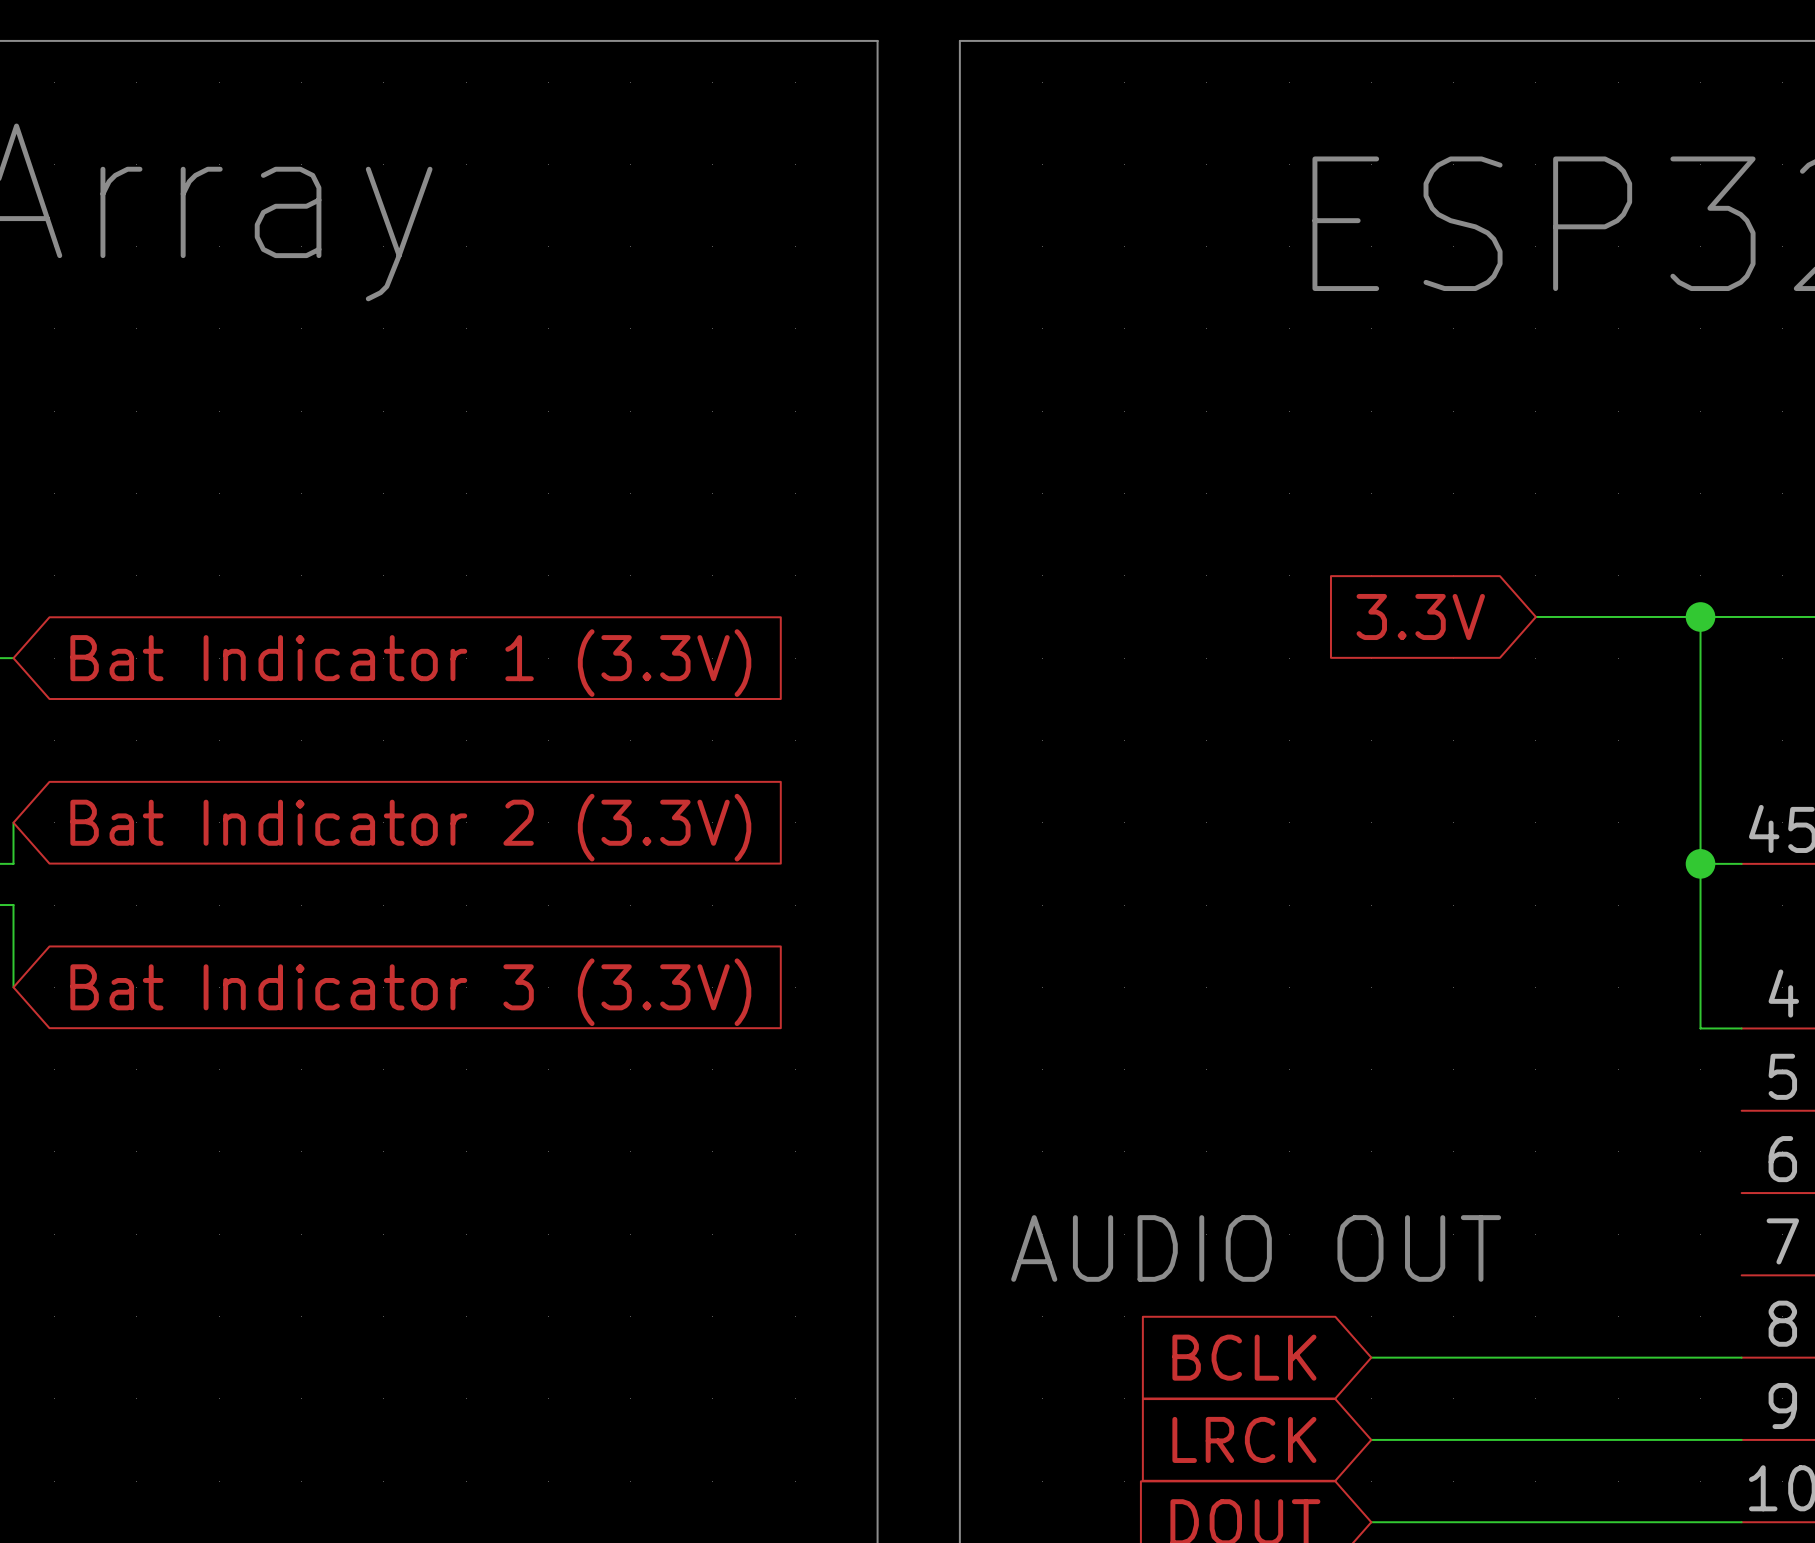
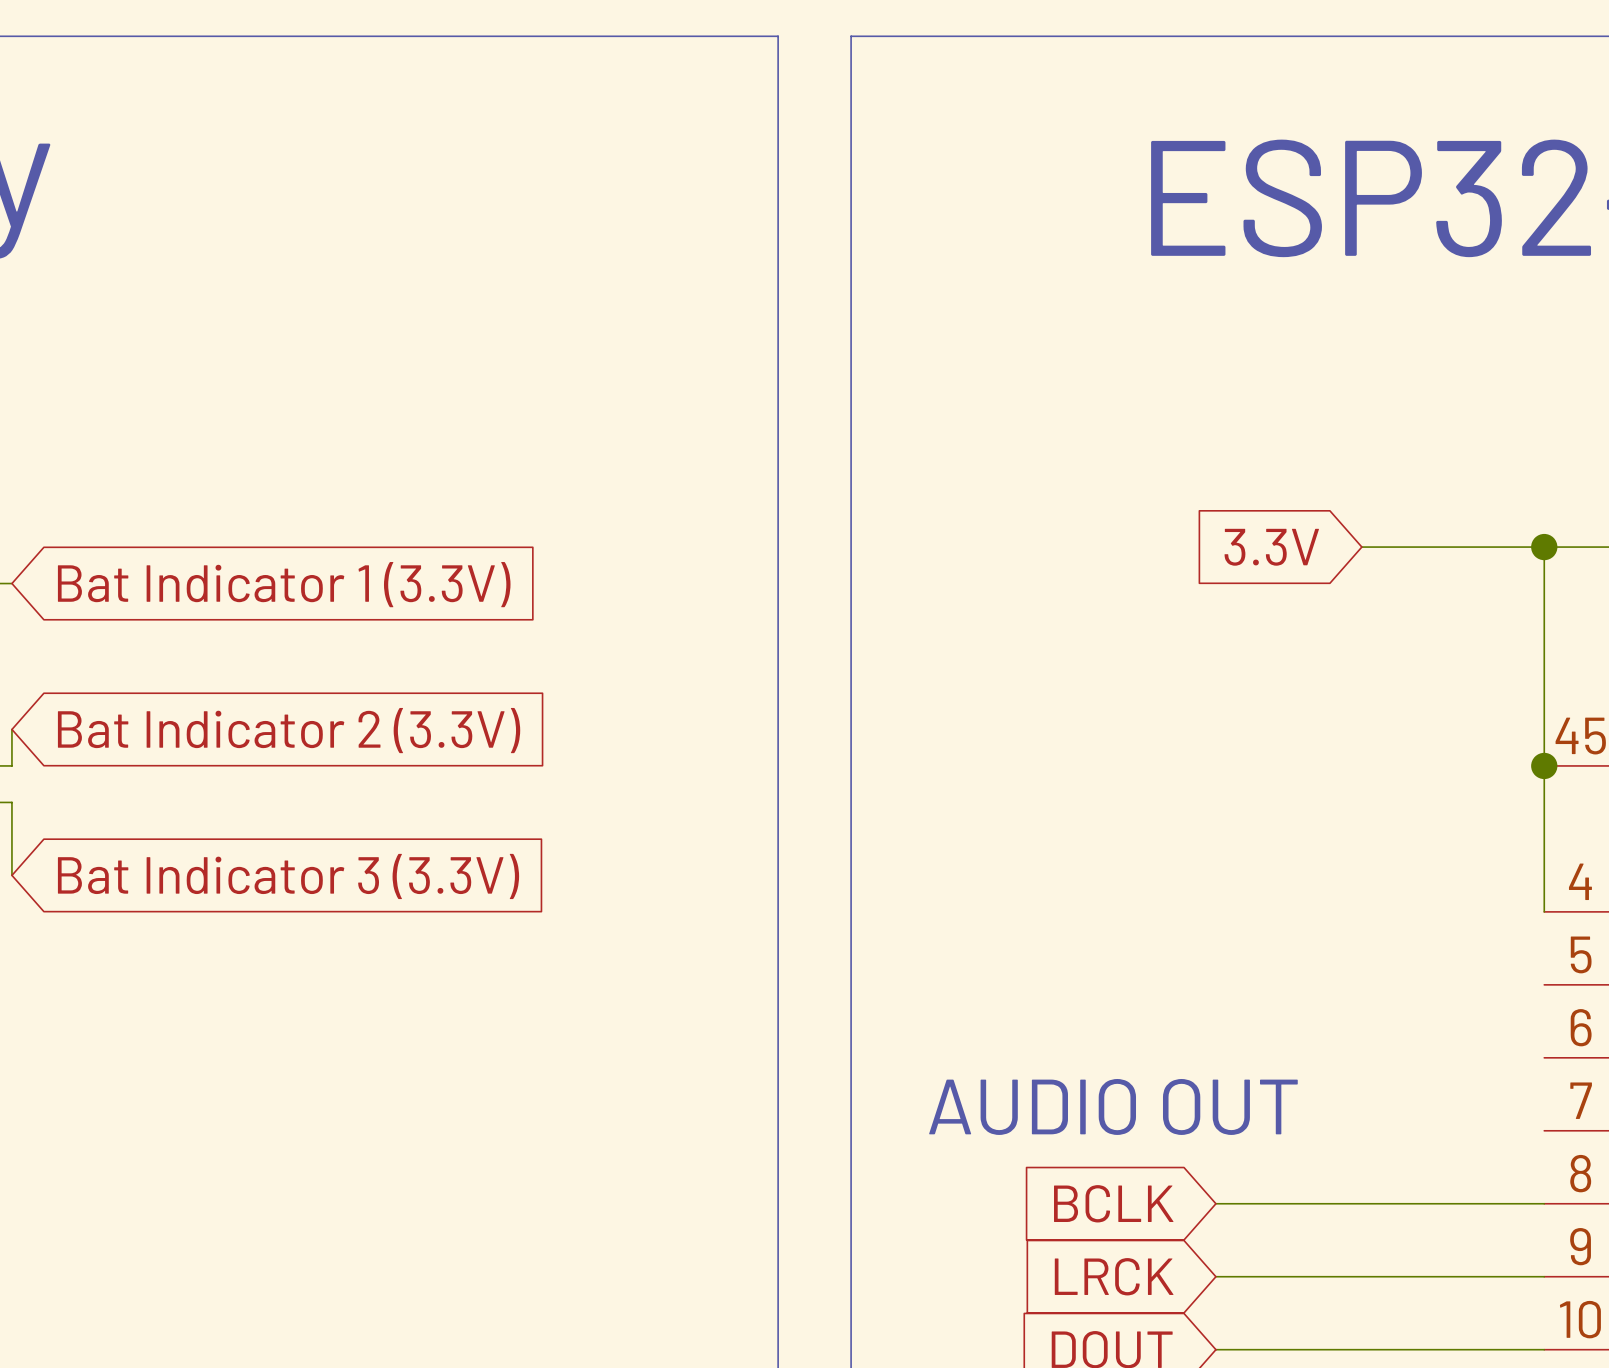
wire: (1700, 616) (1700, 1028) (1741, 1028) -> (1544, 547) (1544, 911)
junction position: (1700, 616) -> (1544, 547)
wire: (1700, 863) (1741, 863) -> none
junction position: (1700, 863) -> (1544, 765)

